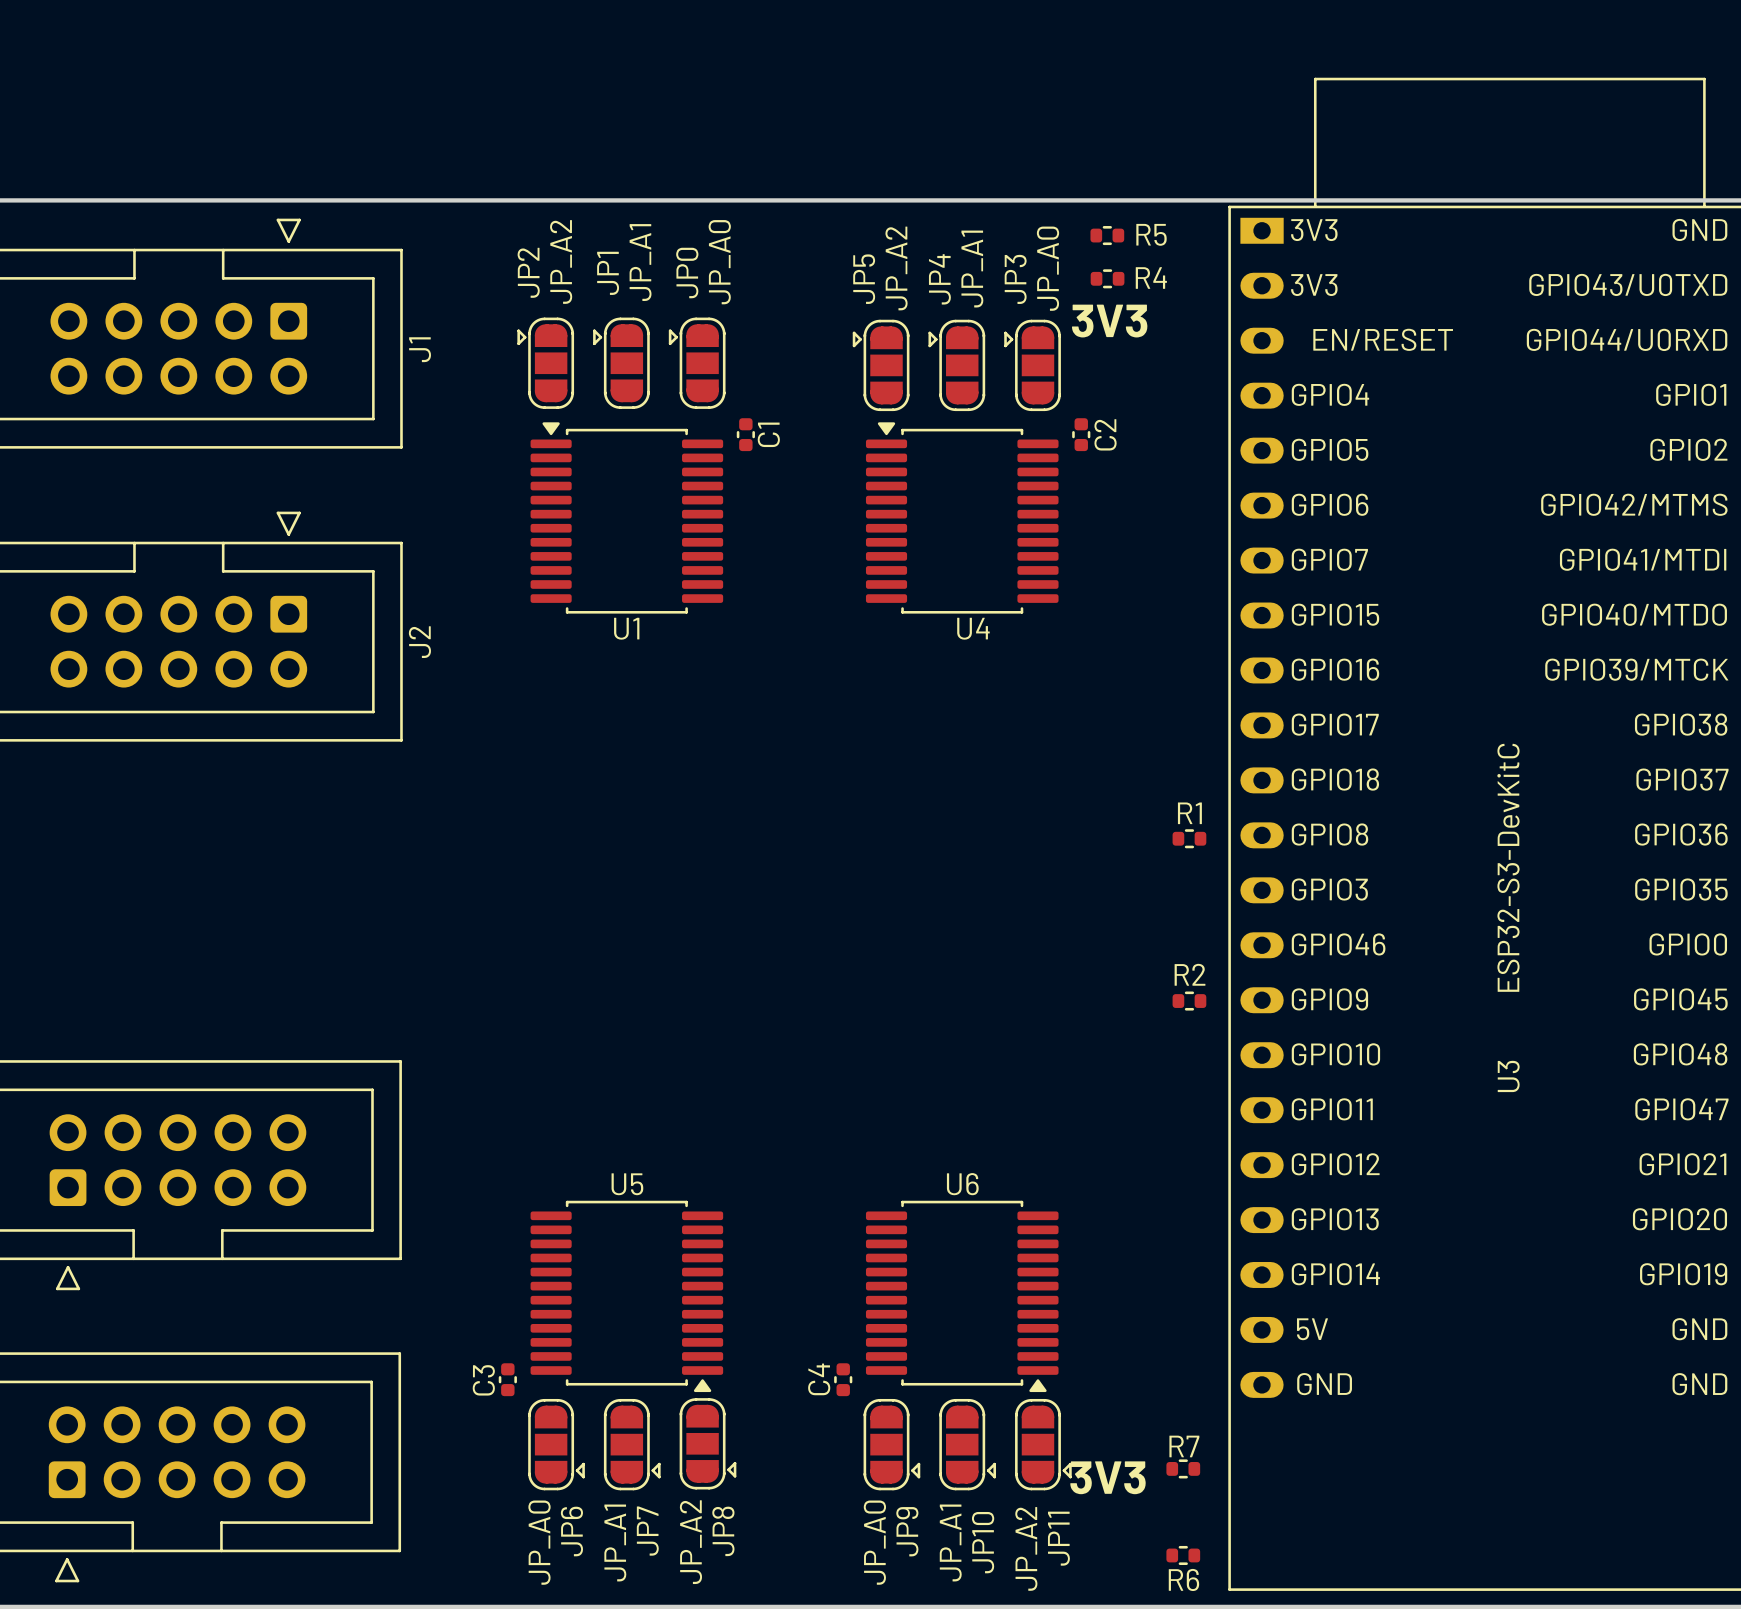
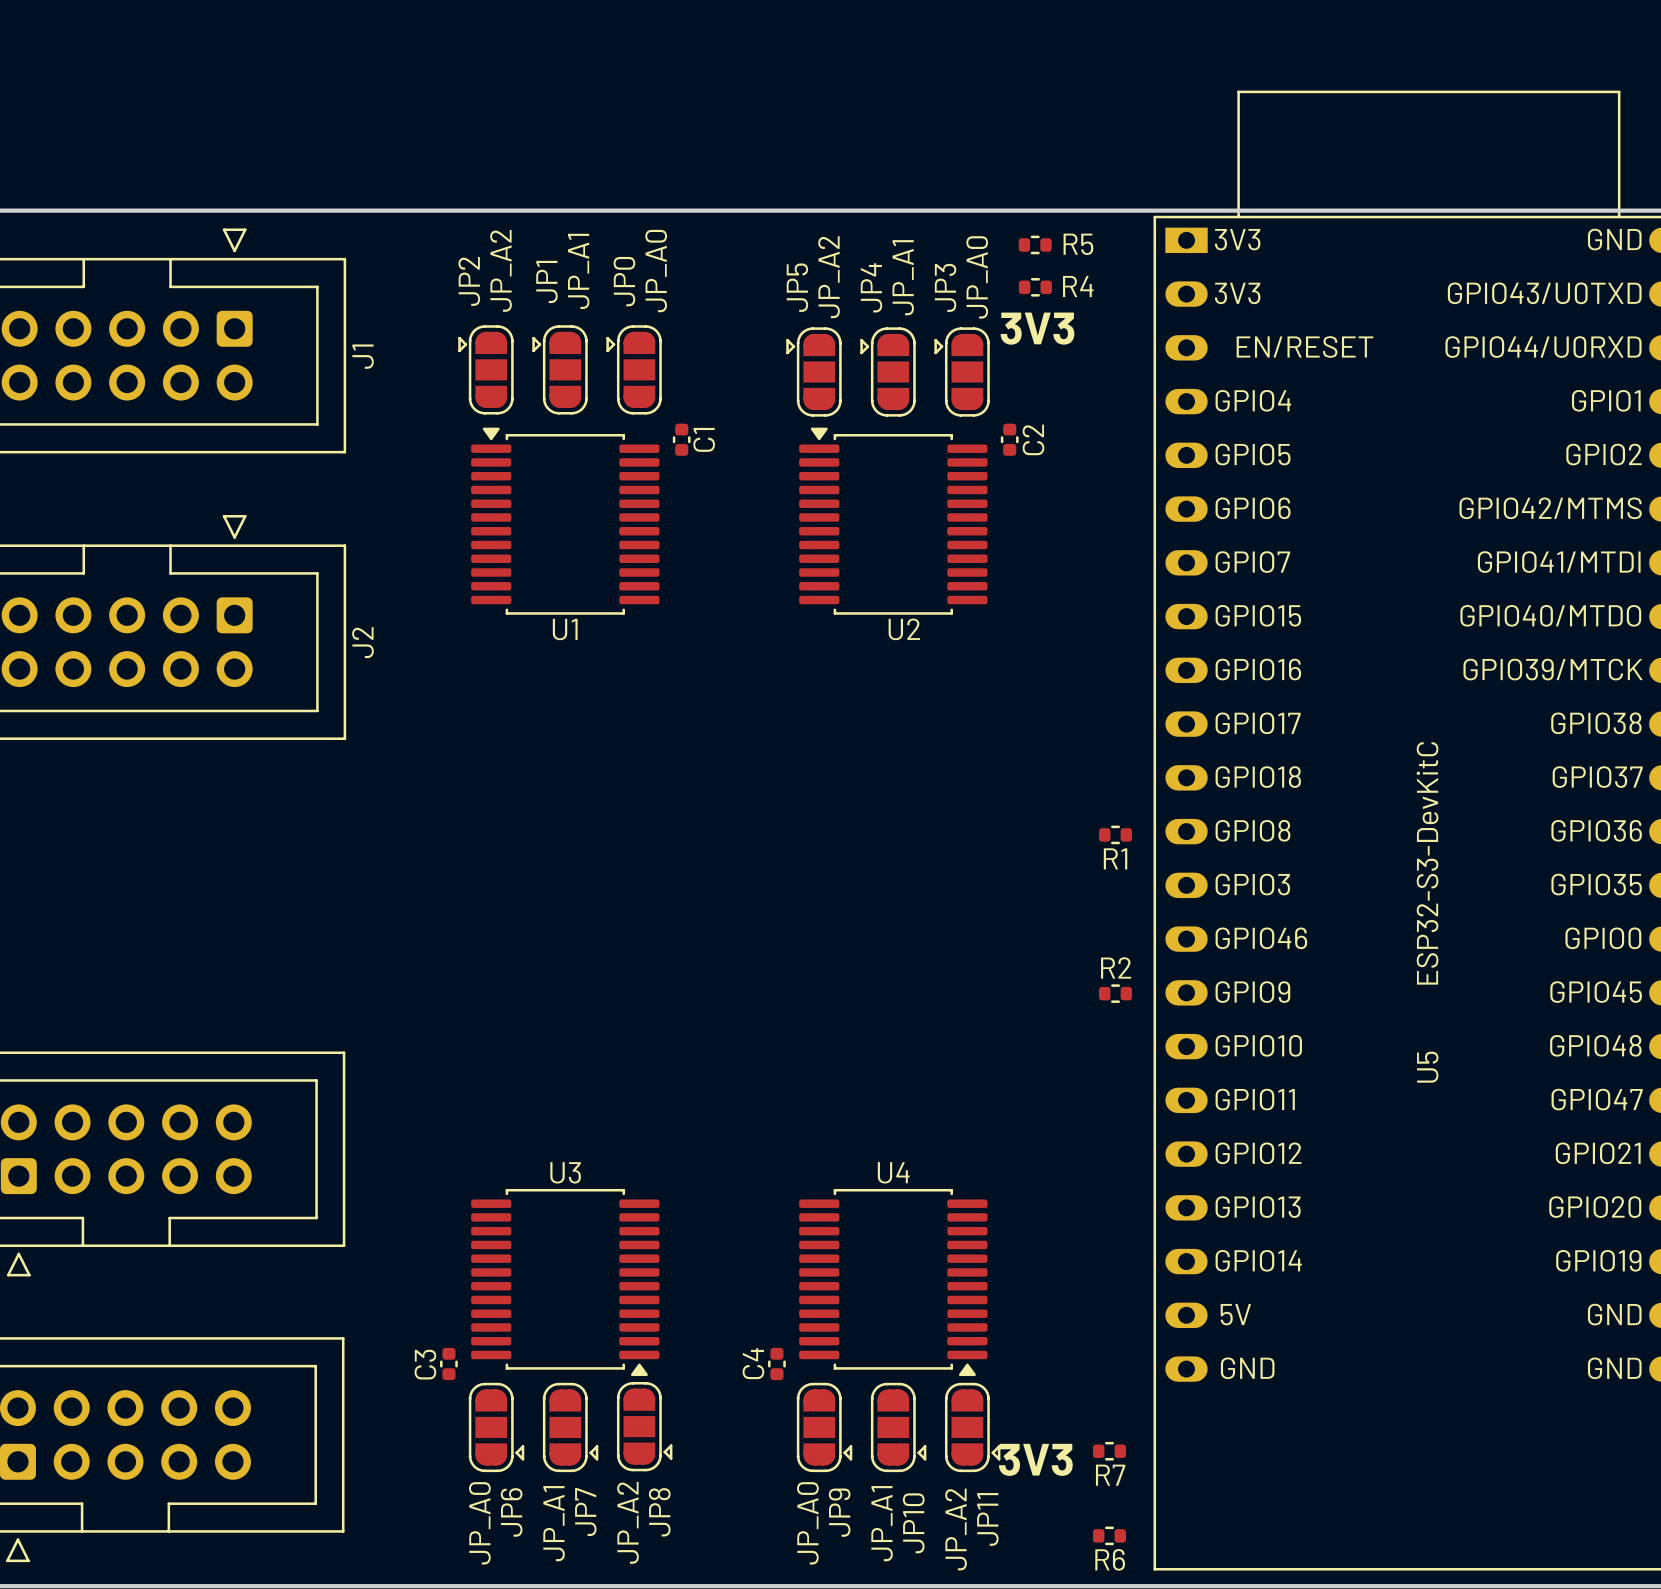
U4 name: U4 (973, 628) -> U2 (904, 629)
R1 name position: R1 (1189, 813) -> R1 (1115, 858)
U3 name: U3 (1508, 1076) -> U5 (1427, 1067)
U5 name: U5 (627, 1184) -> U3 (565, 1172)
U6 name: U6 (962, 1184) -> U4 (893, 1172)
R7 name position: R7 (1184, 1446) -> R7 (1110, 1475)

